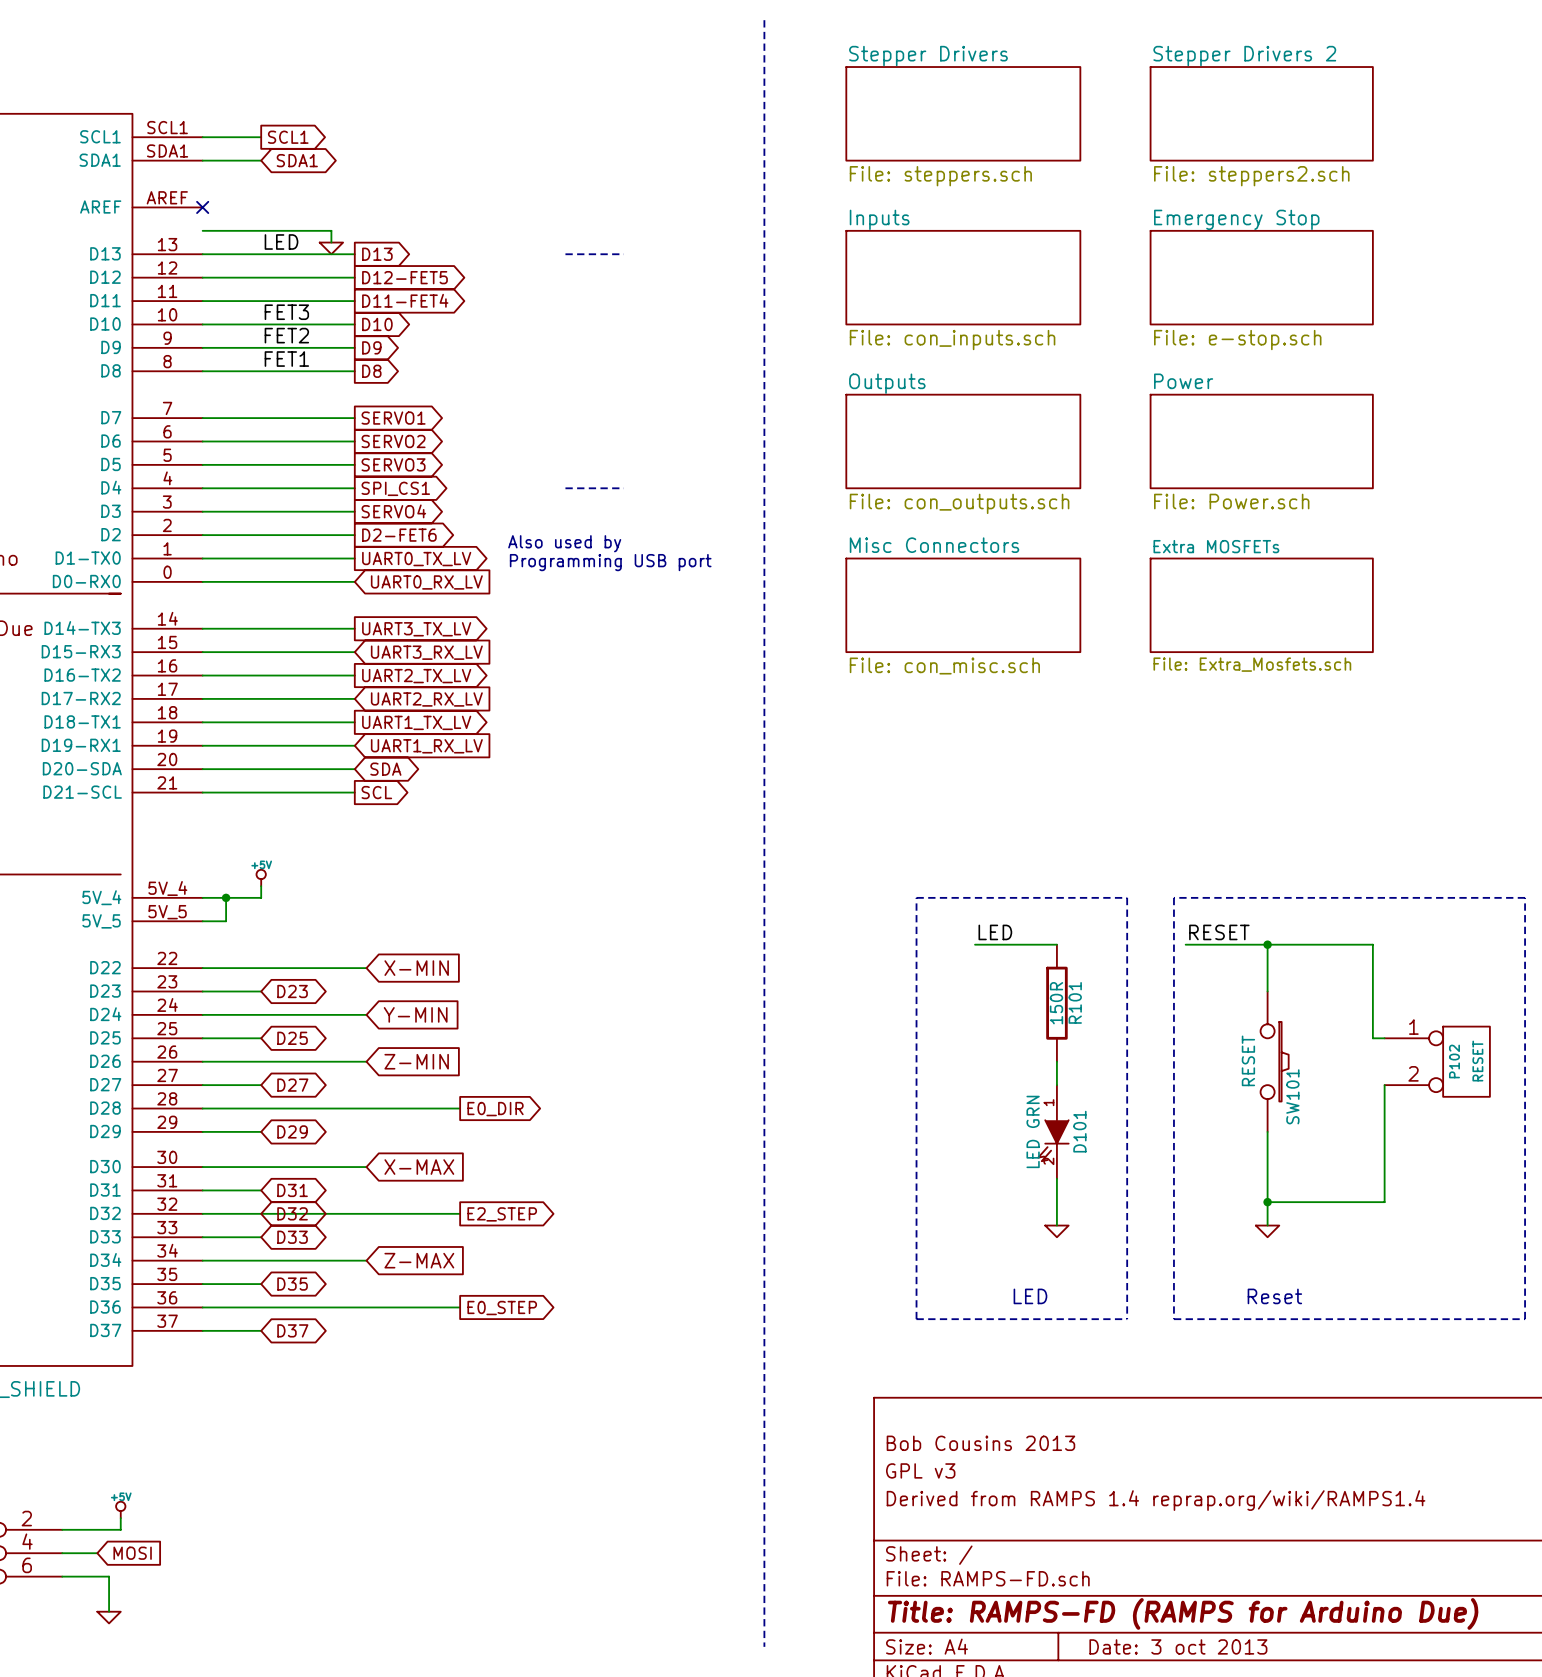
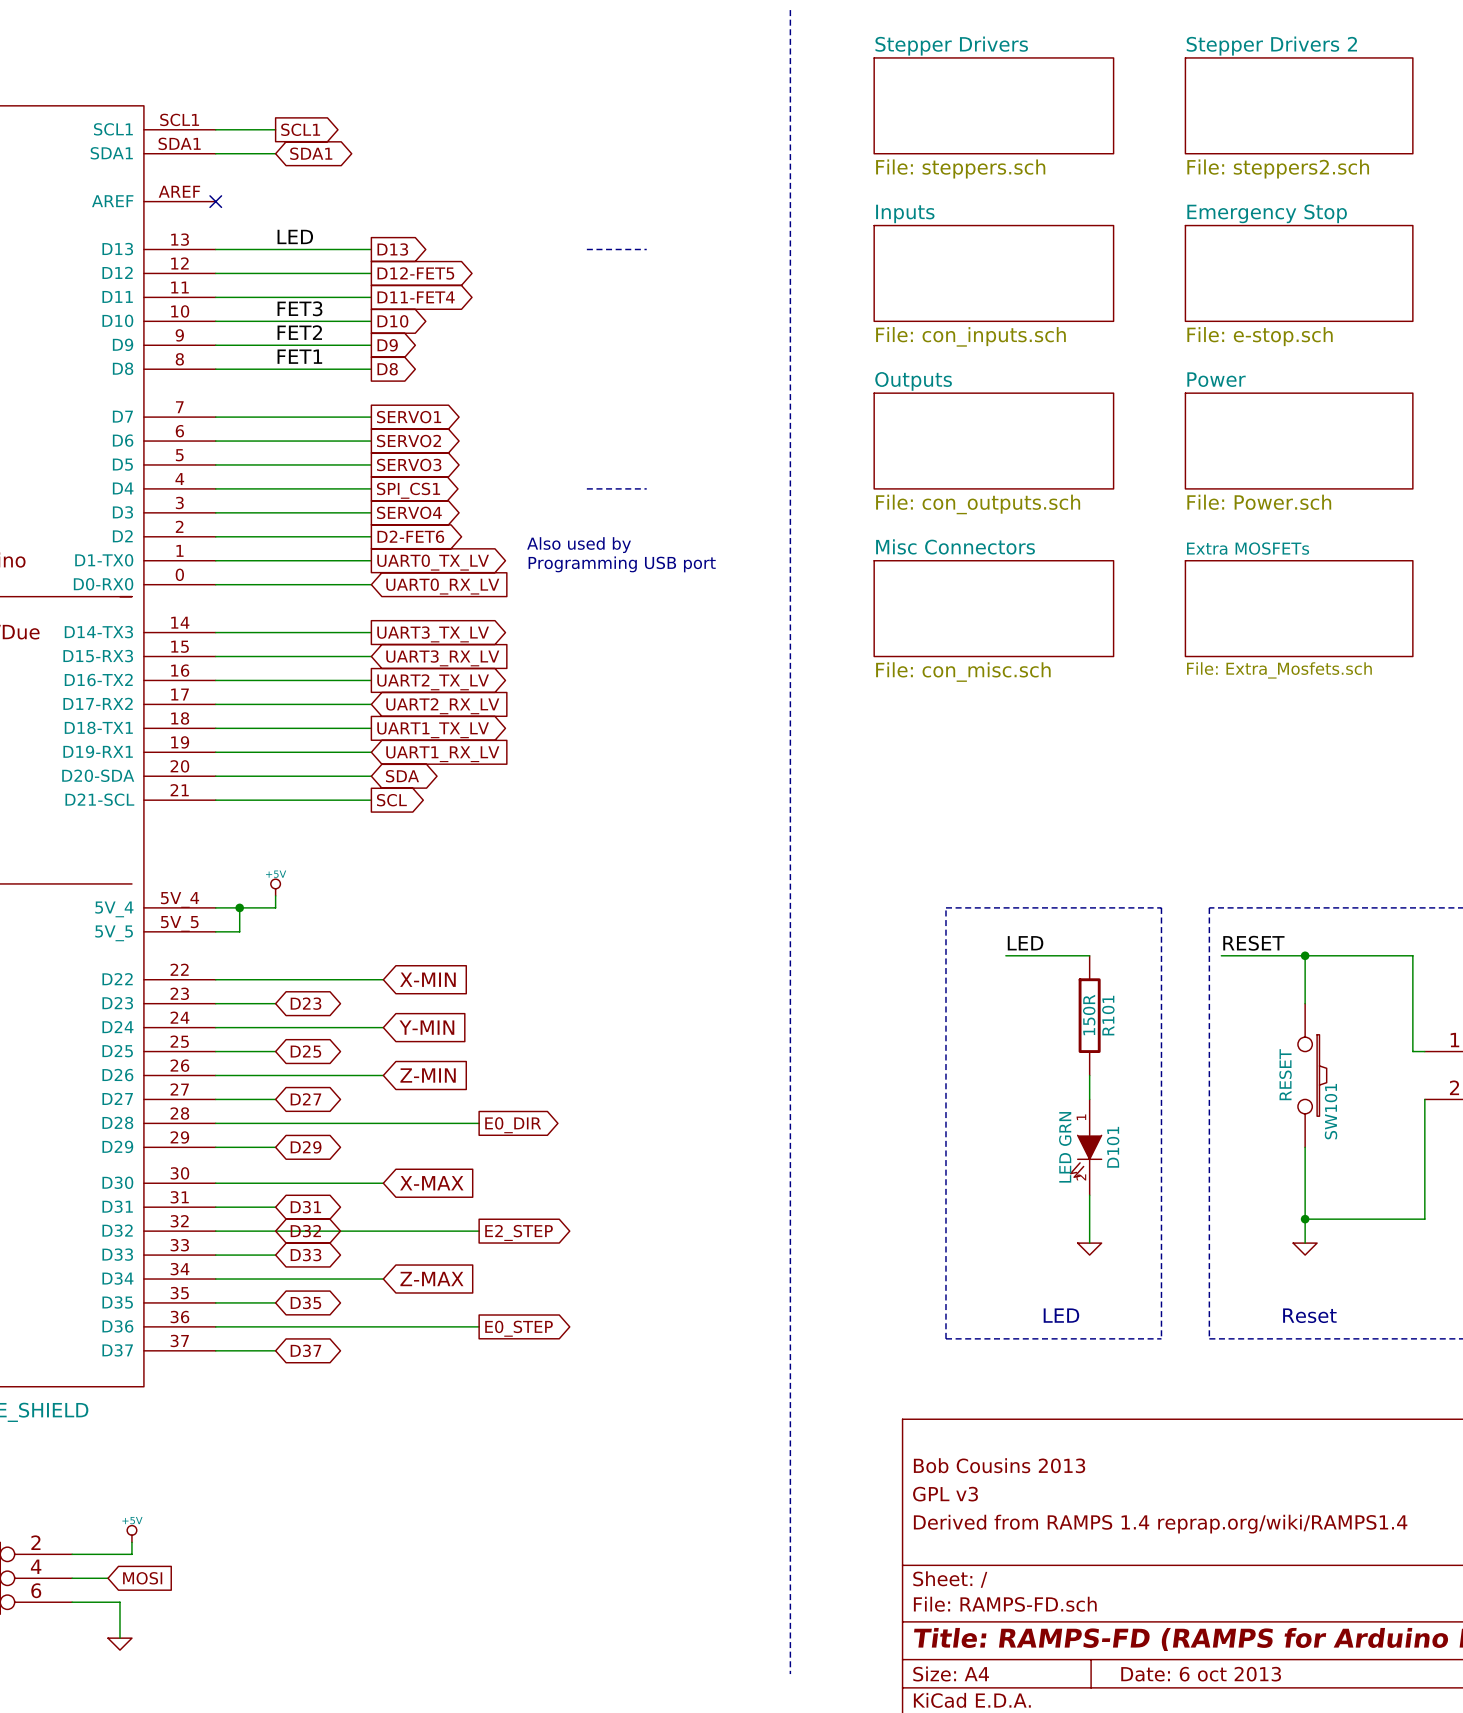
wire: (202, 230) (331, 230) (331, 242) -> none
power symbol: (331, 248) -> none
title block: Date: 3 oct 2013 (1178, 1646) -> Date: 6 oct 2013 (1201, 1674)

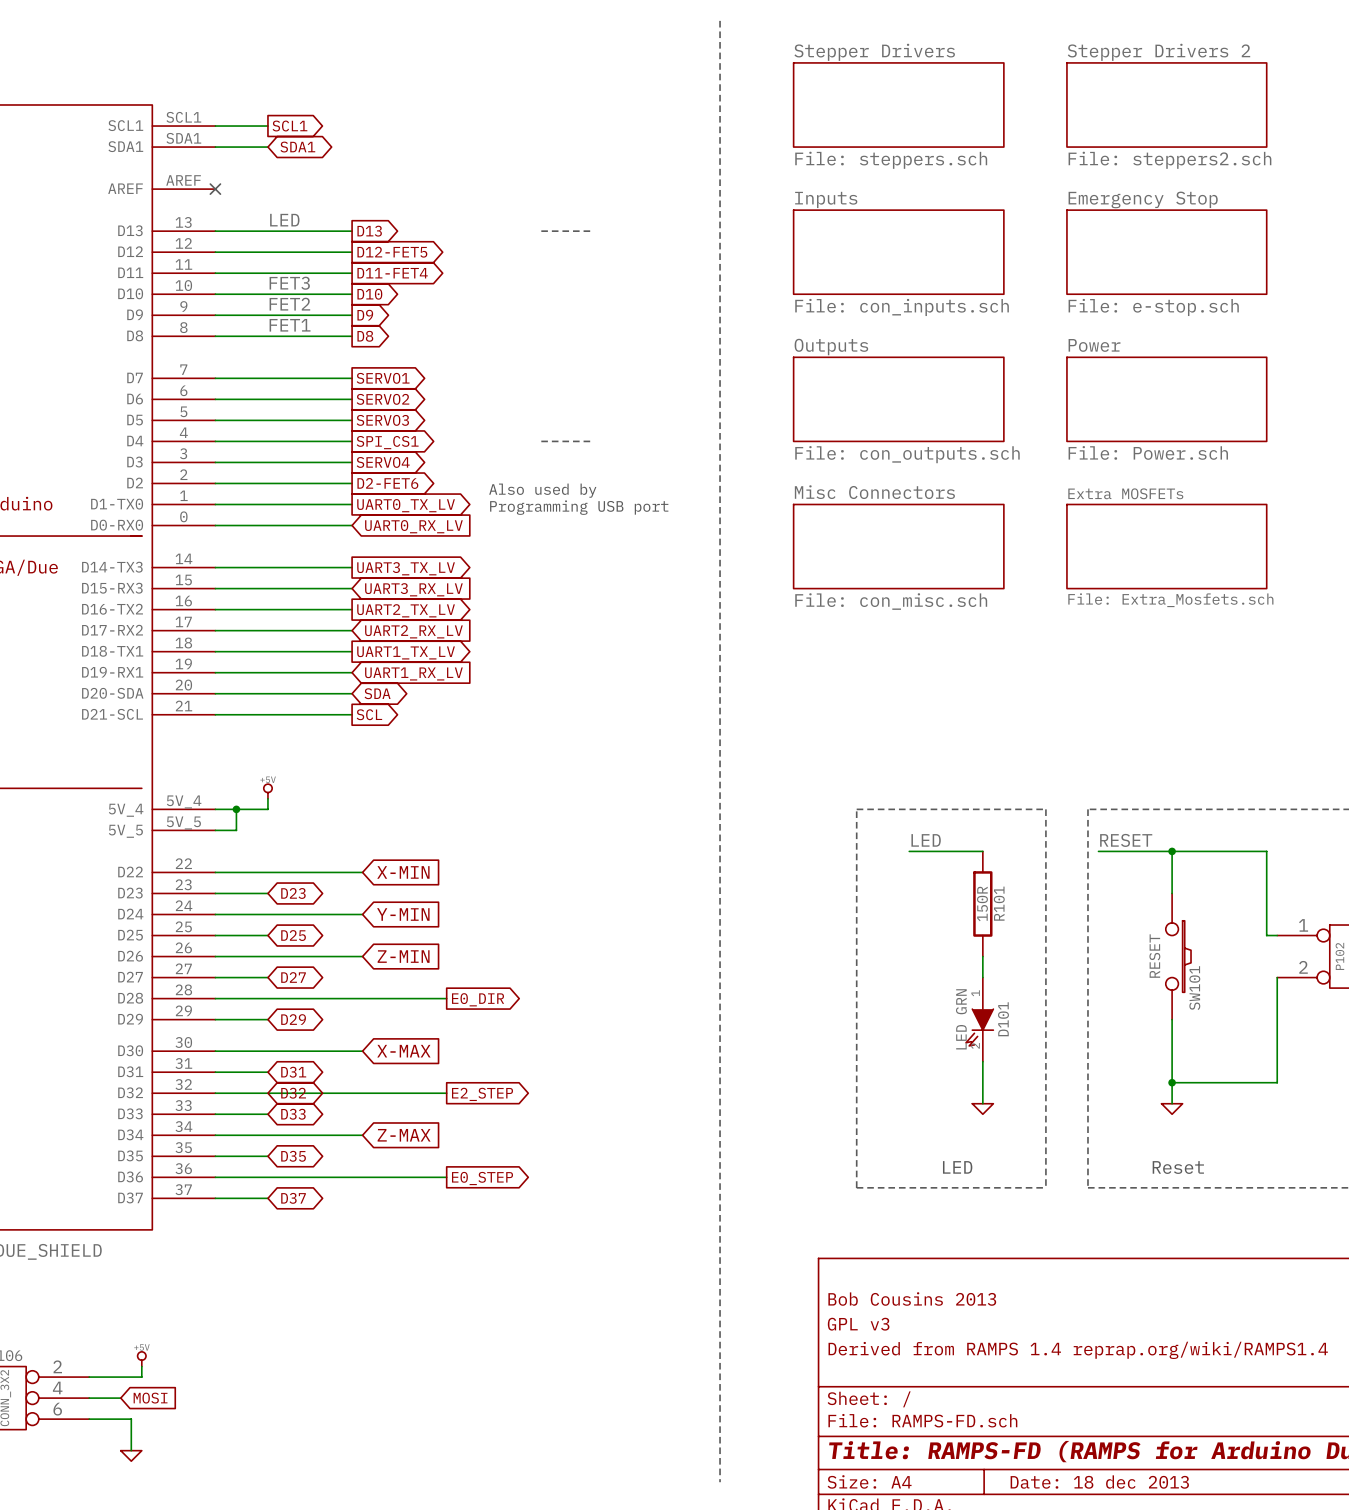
title block: Date: 6 oct 2013 (1201, 1674) -> Date: 18 dec 2013 (1099, 1482)

